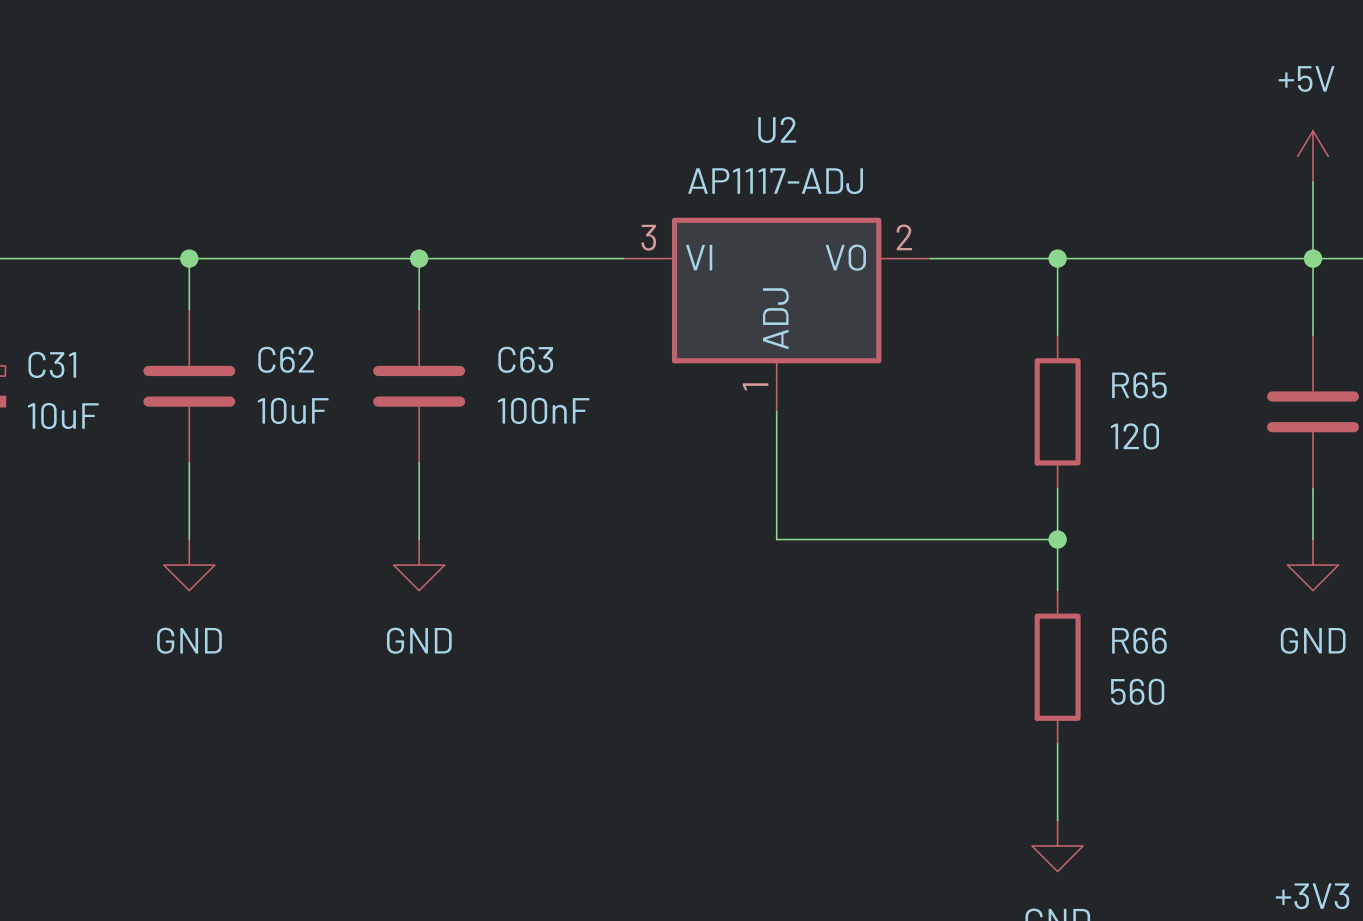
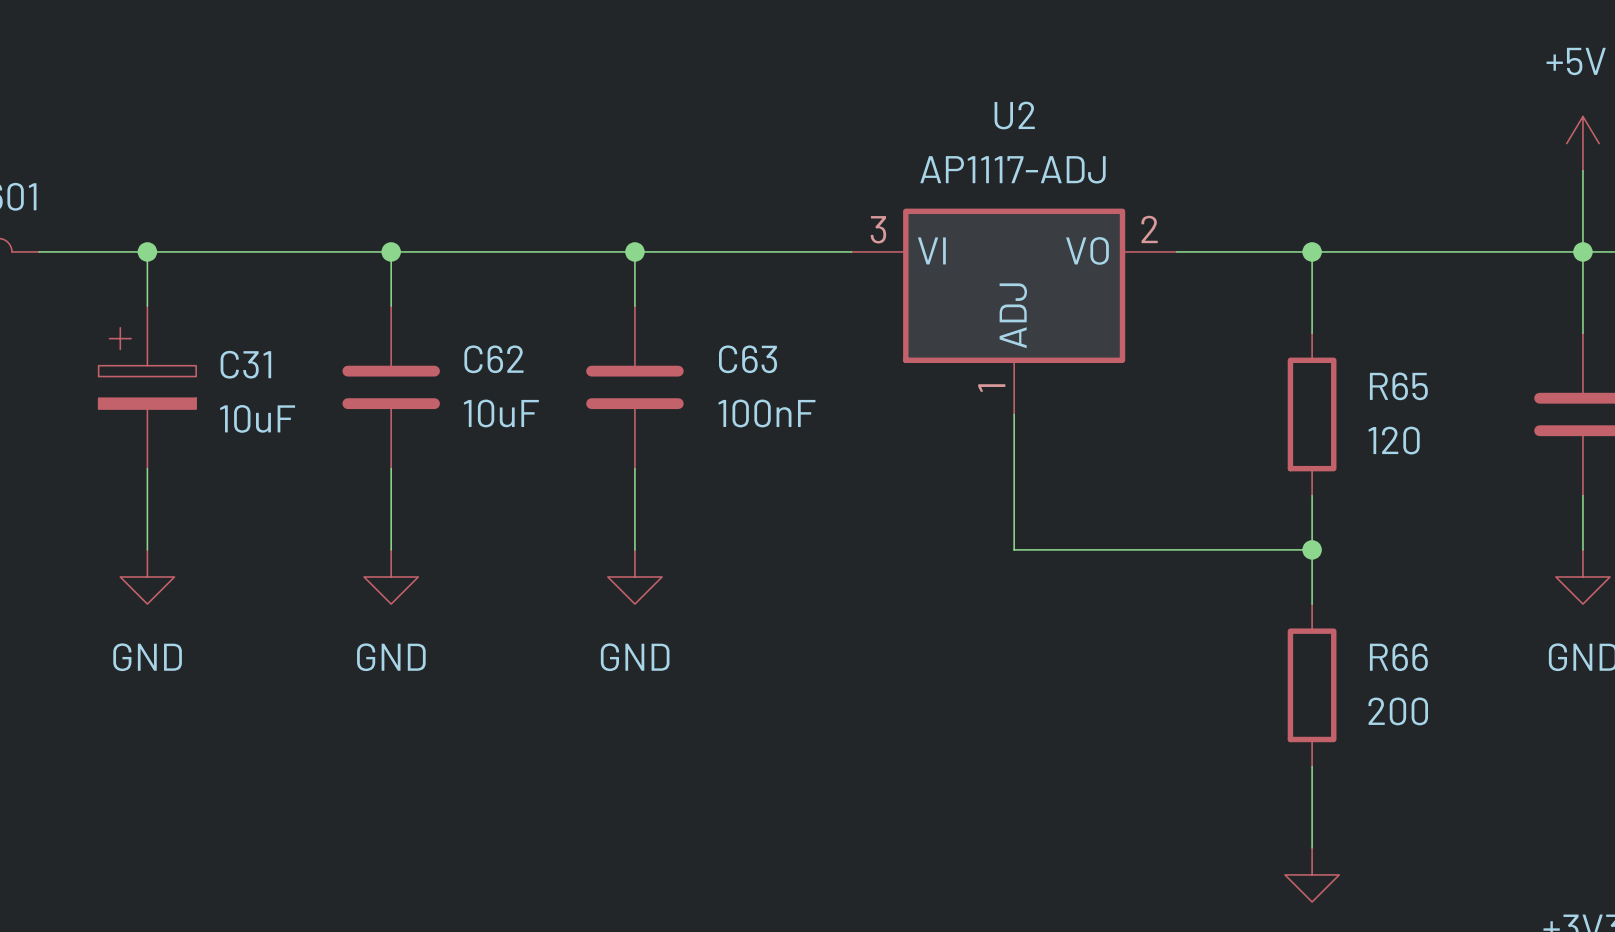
R66 value: 560 (1137, 691) -> 200 (1398, 711)

